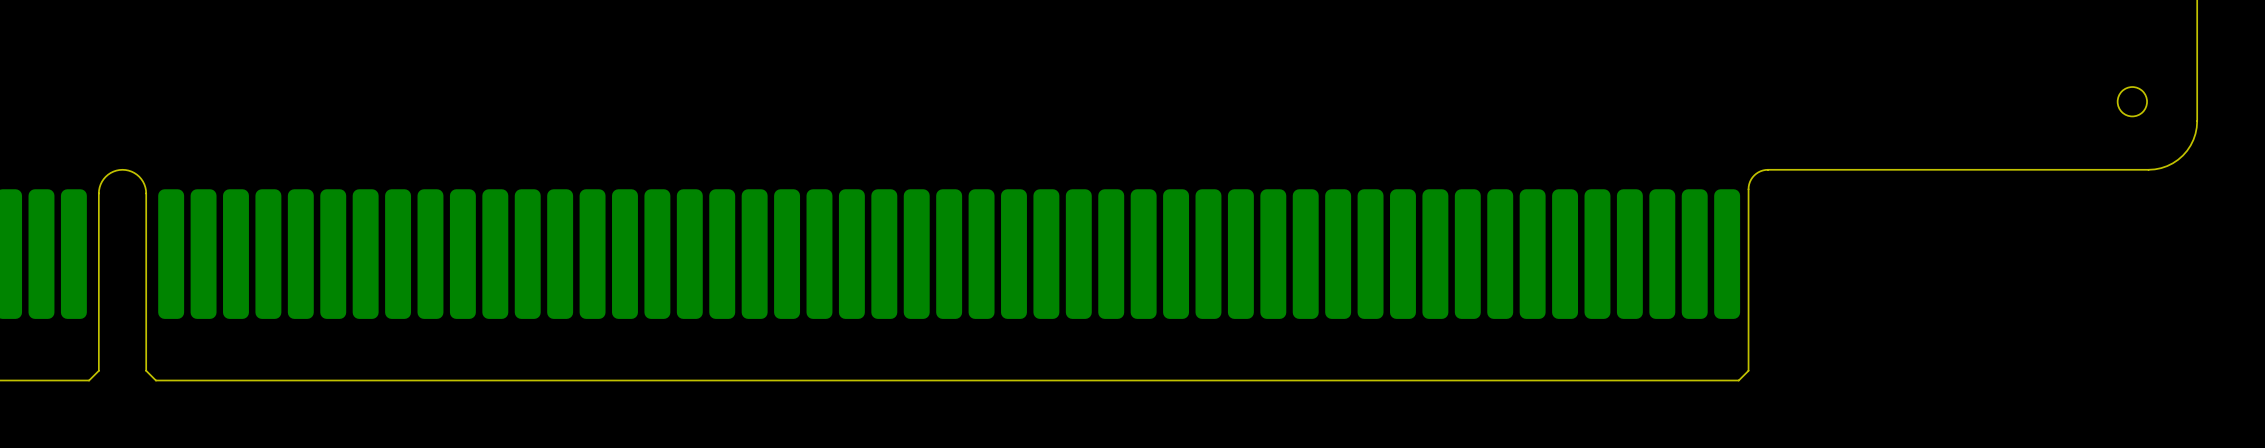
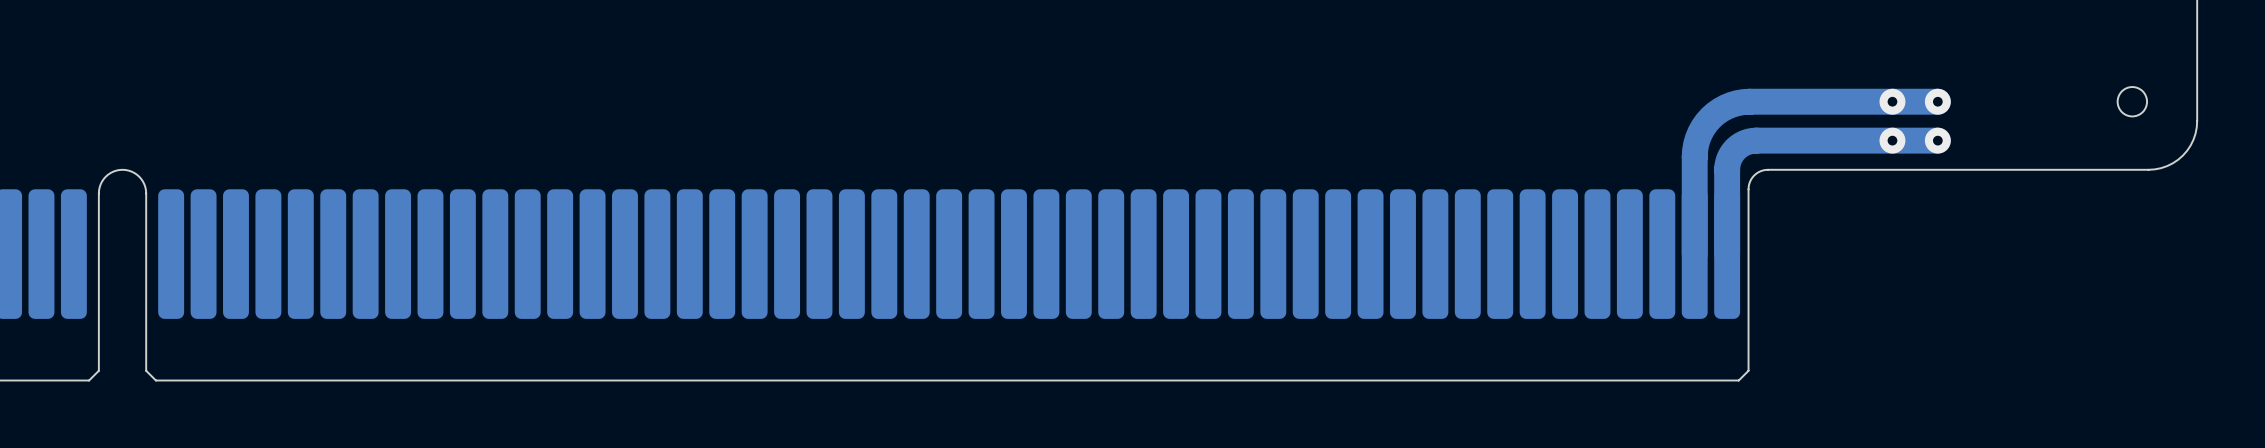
via: none -> (1892, 101)
track: none -> (1937, 101) (1749, 101) (1731, 104) (1720, 110) (1703, 127) (1696, 144) (1694, 254)
via: none -> (1937, 101)
via: none -> (1892, 140)
track: none -> (1937, 140) (1756, 140) (1741, 144) (1733, 152) (1727, 165) (1727, 254)
via: none -> (1937, 140)

